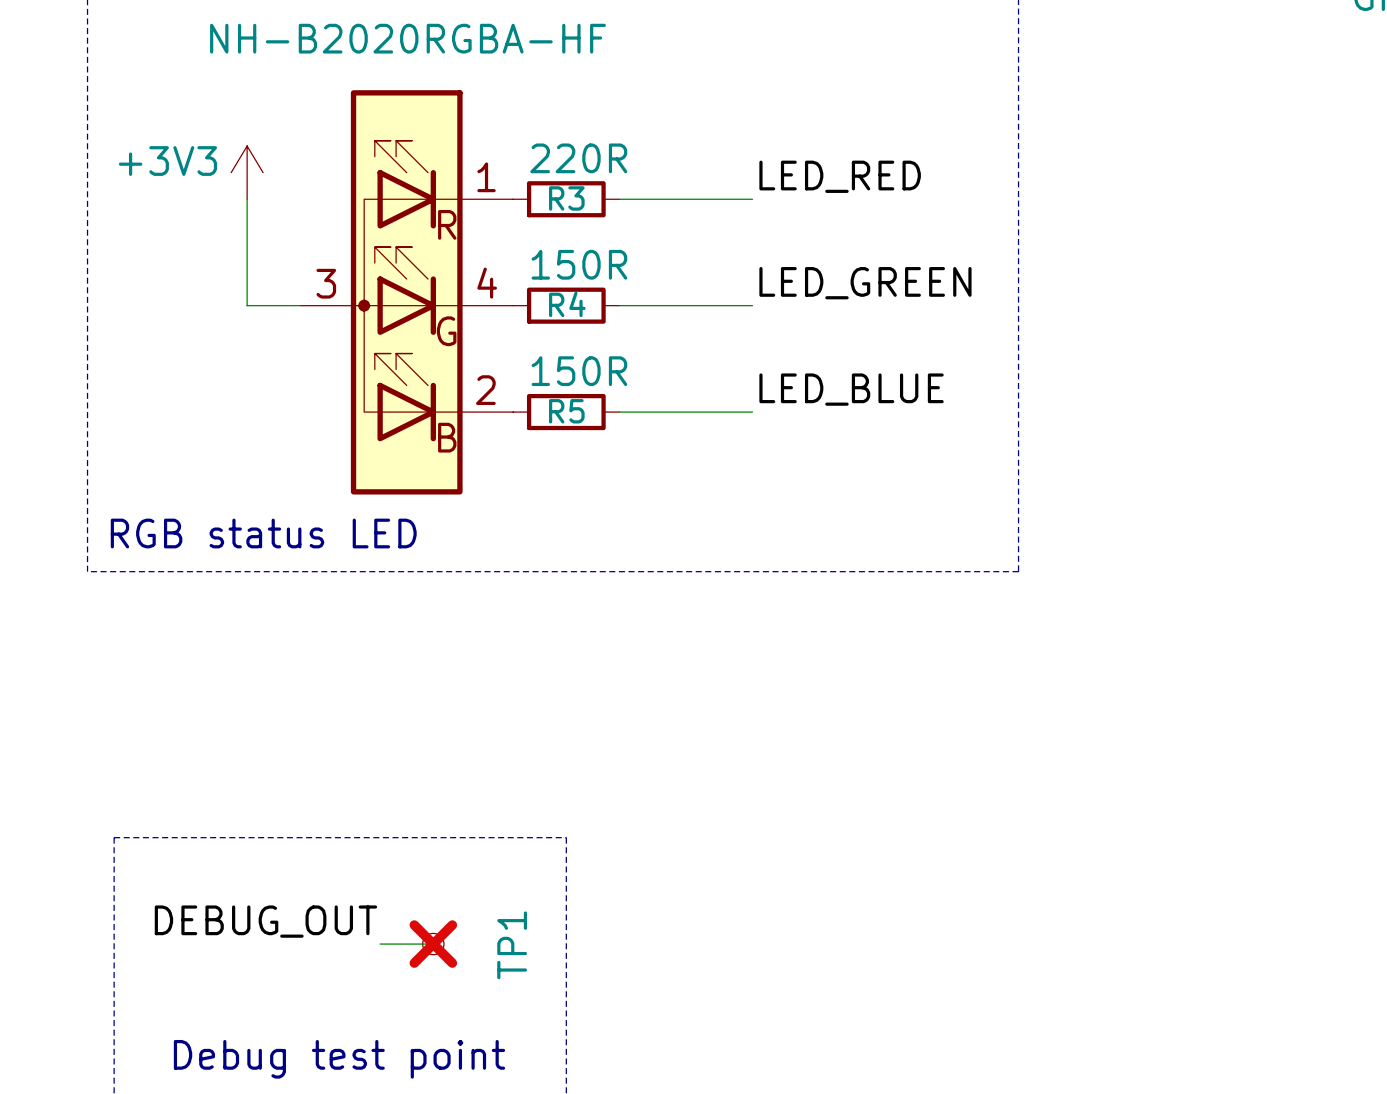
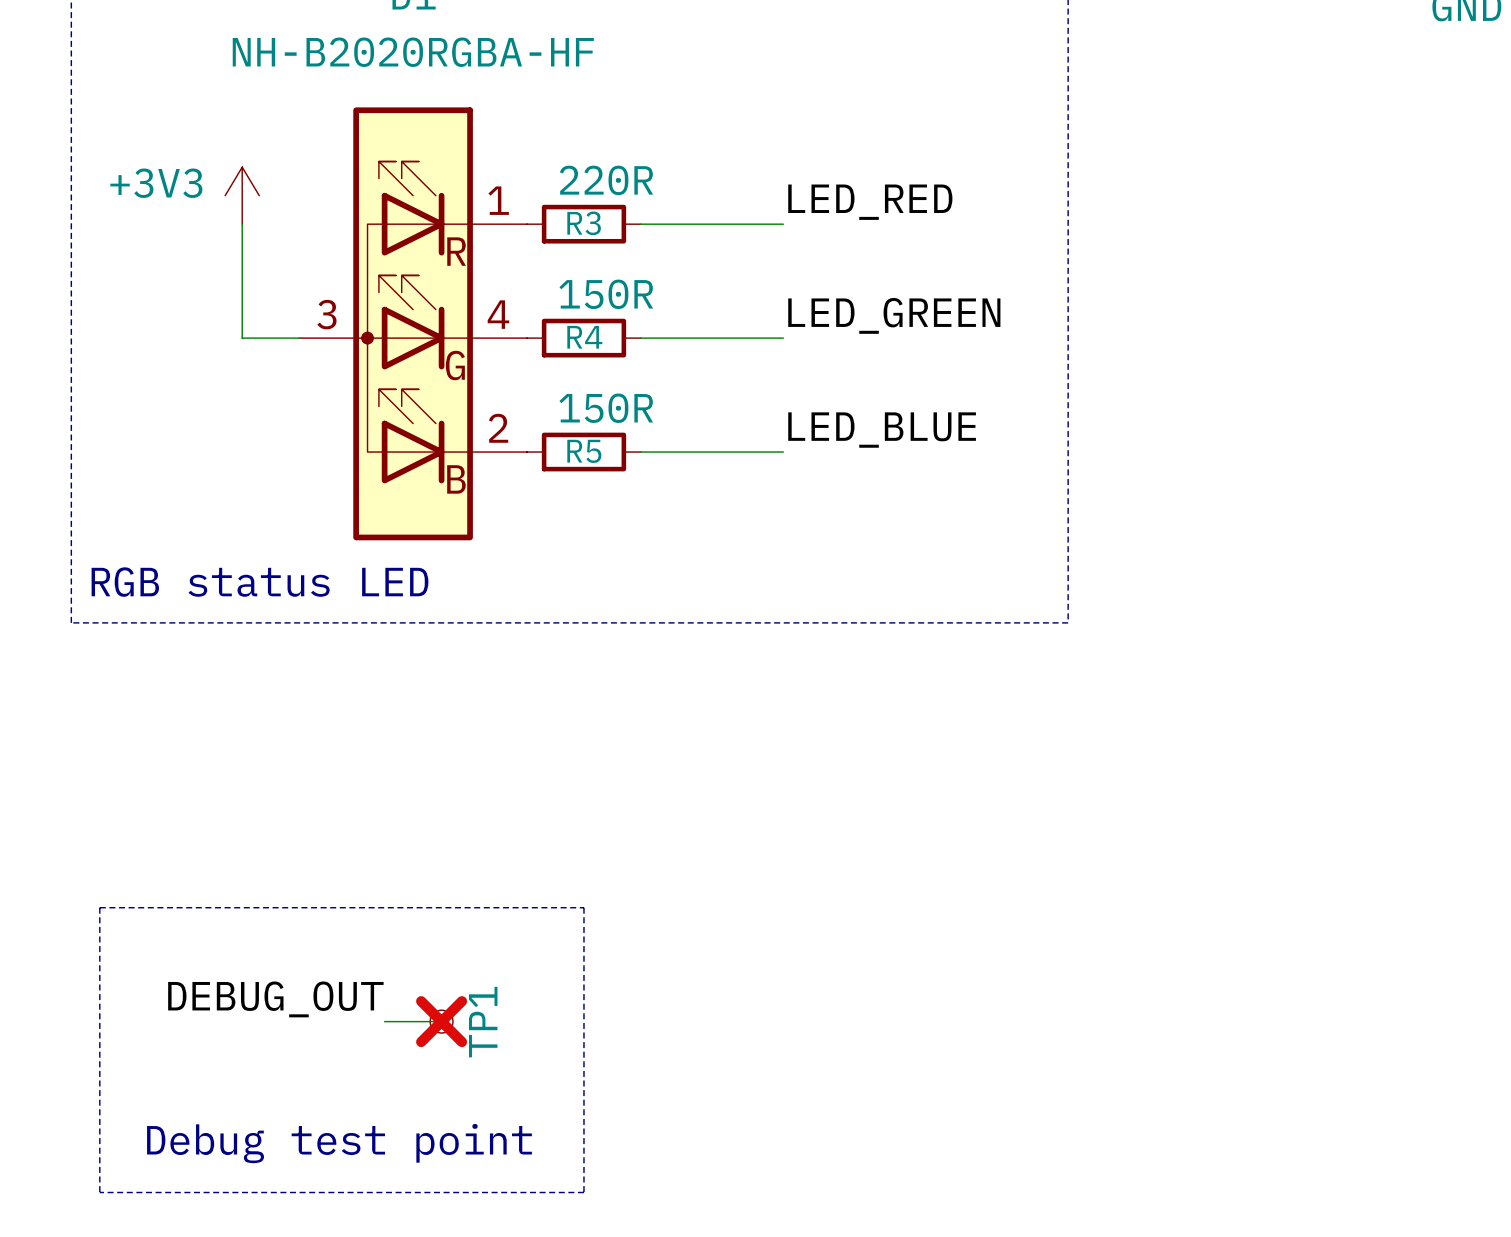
TP1 name position: TP1 (512, 945) -> TP1 (483, 1022)

